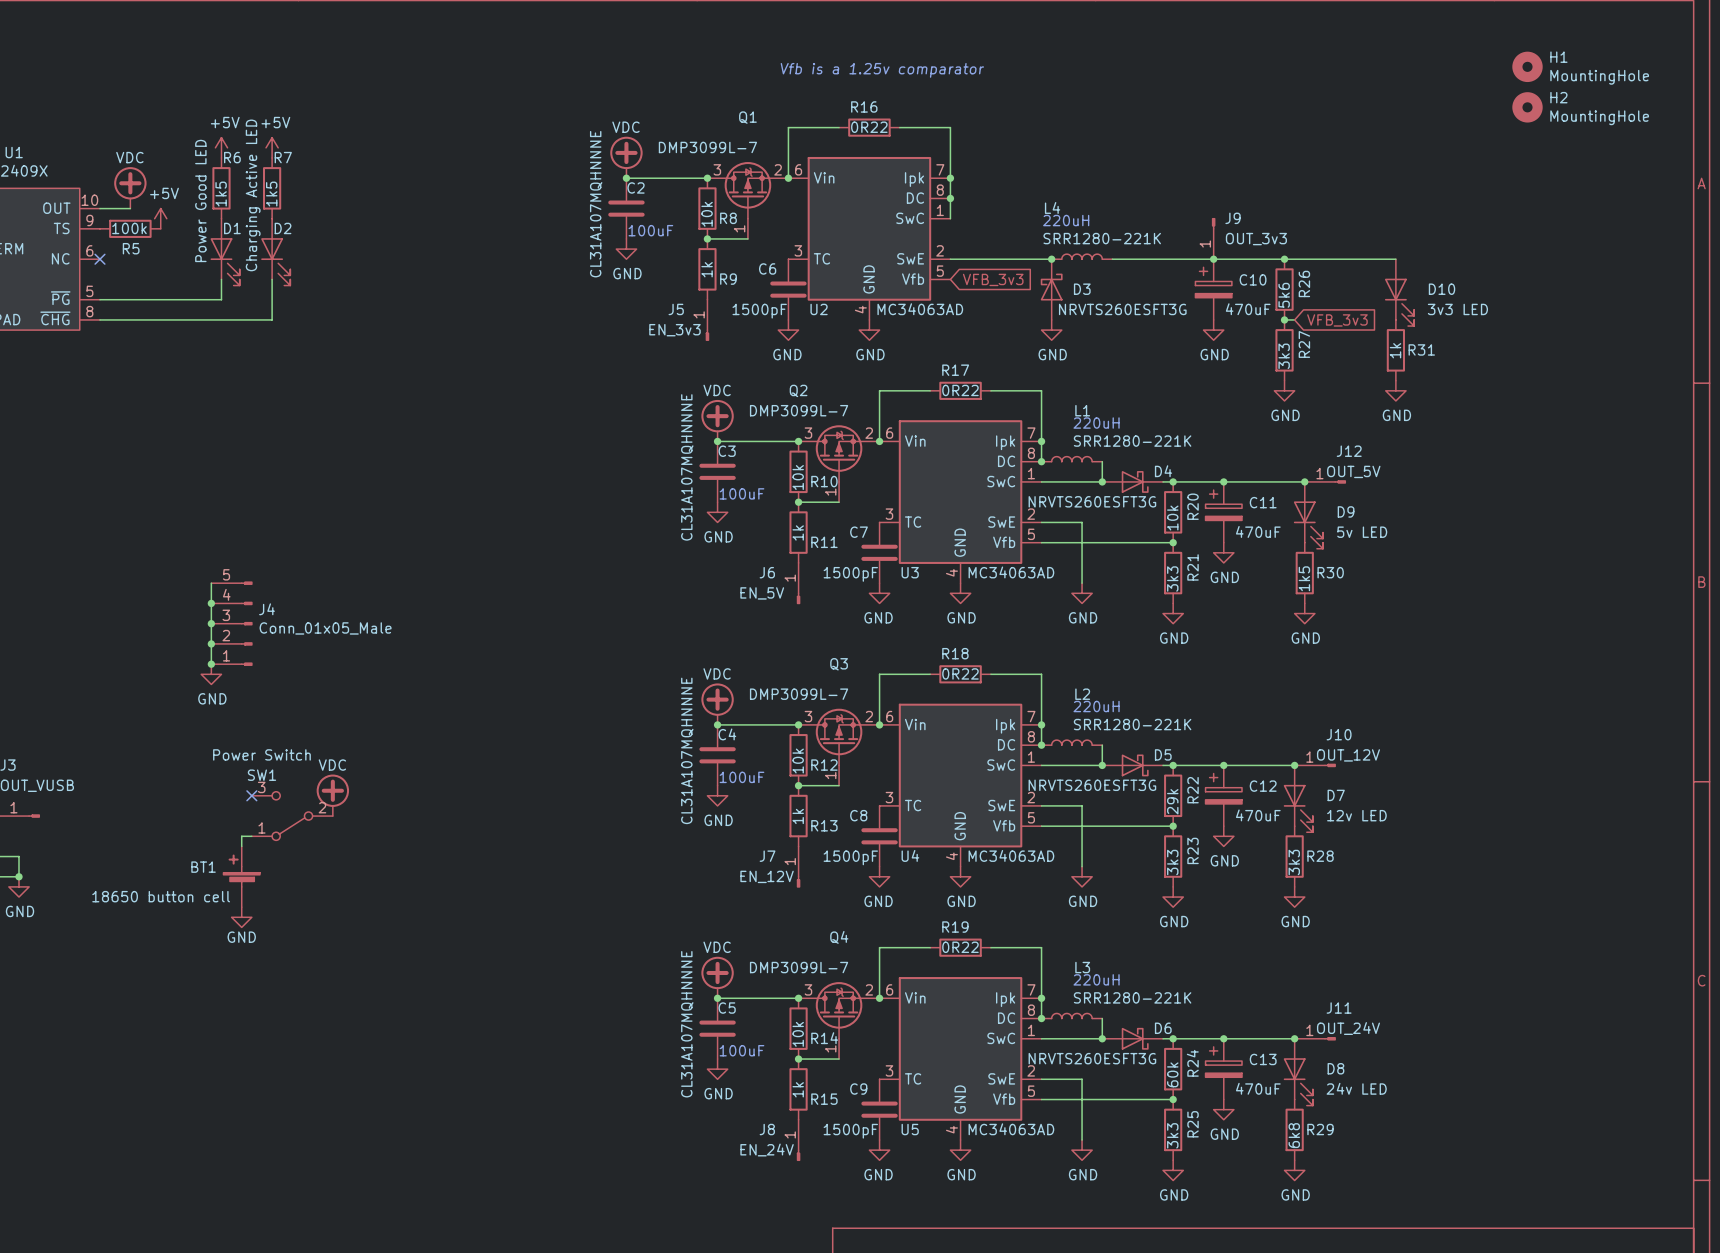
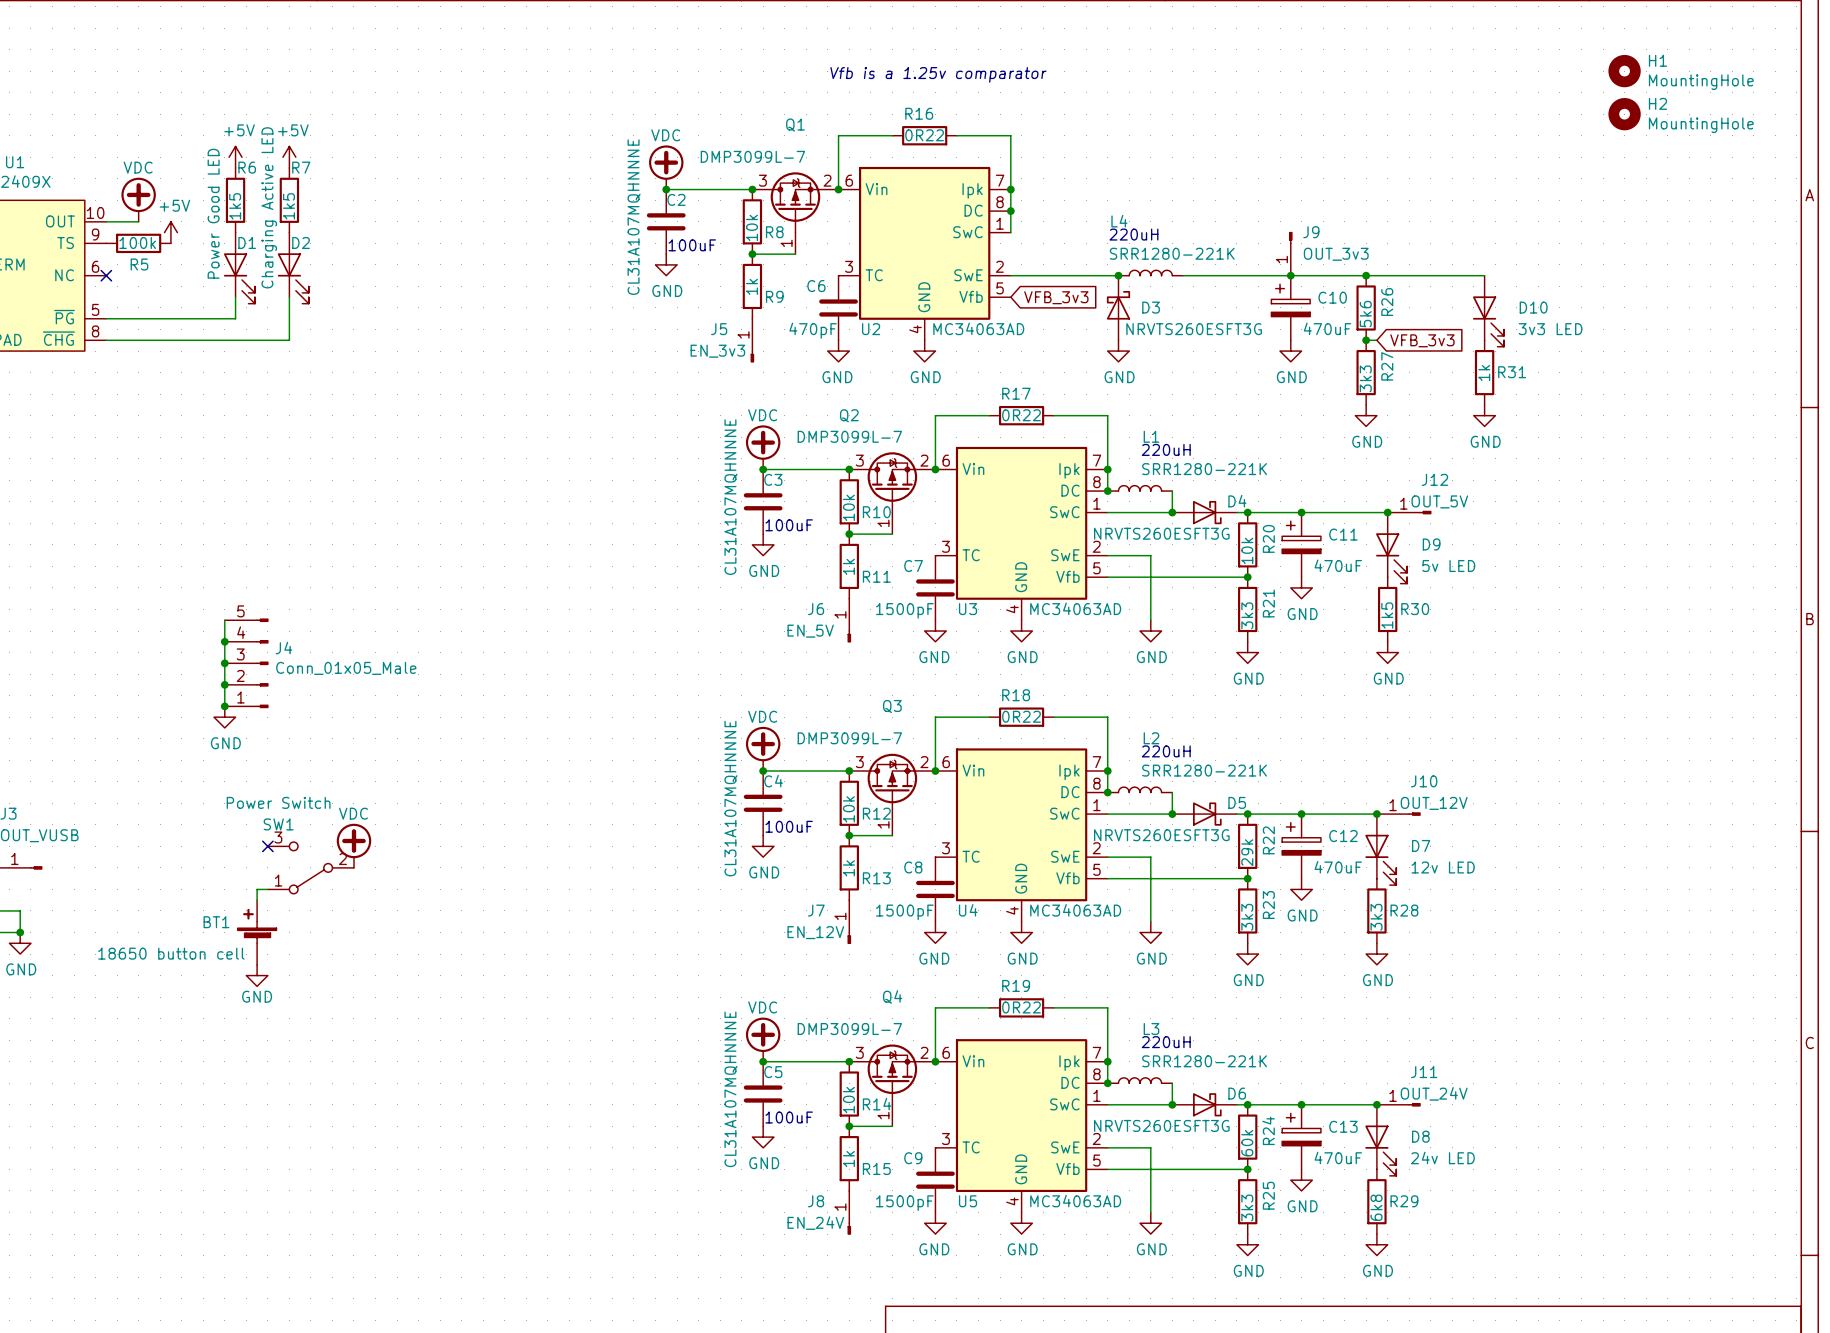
C6 value: 1500pF (759, 311) -> 470pF (813, 330)

